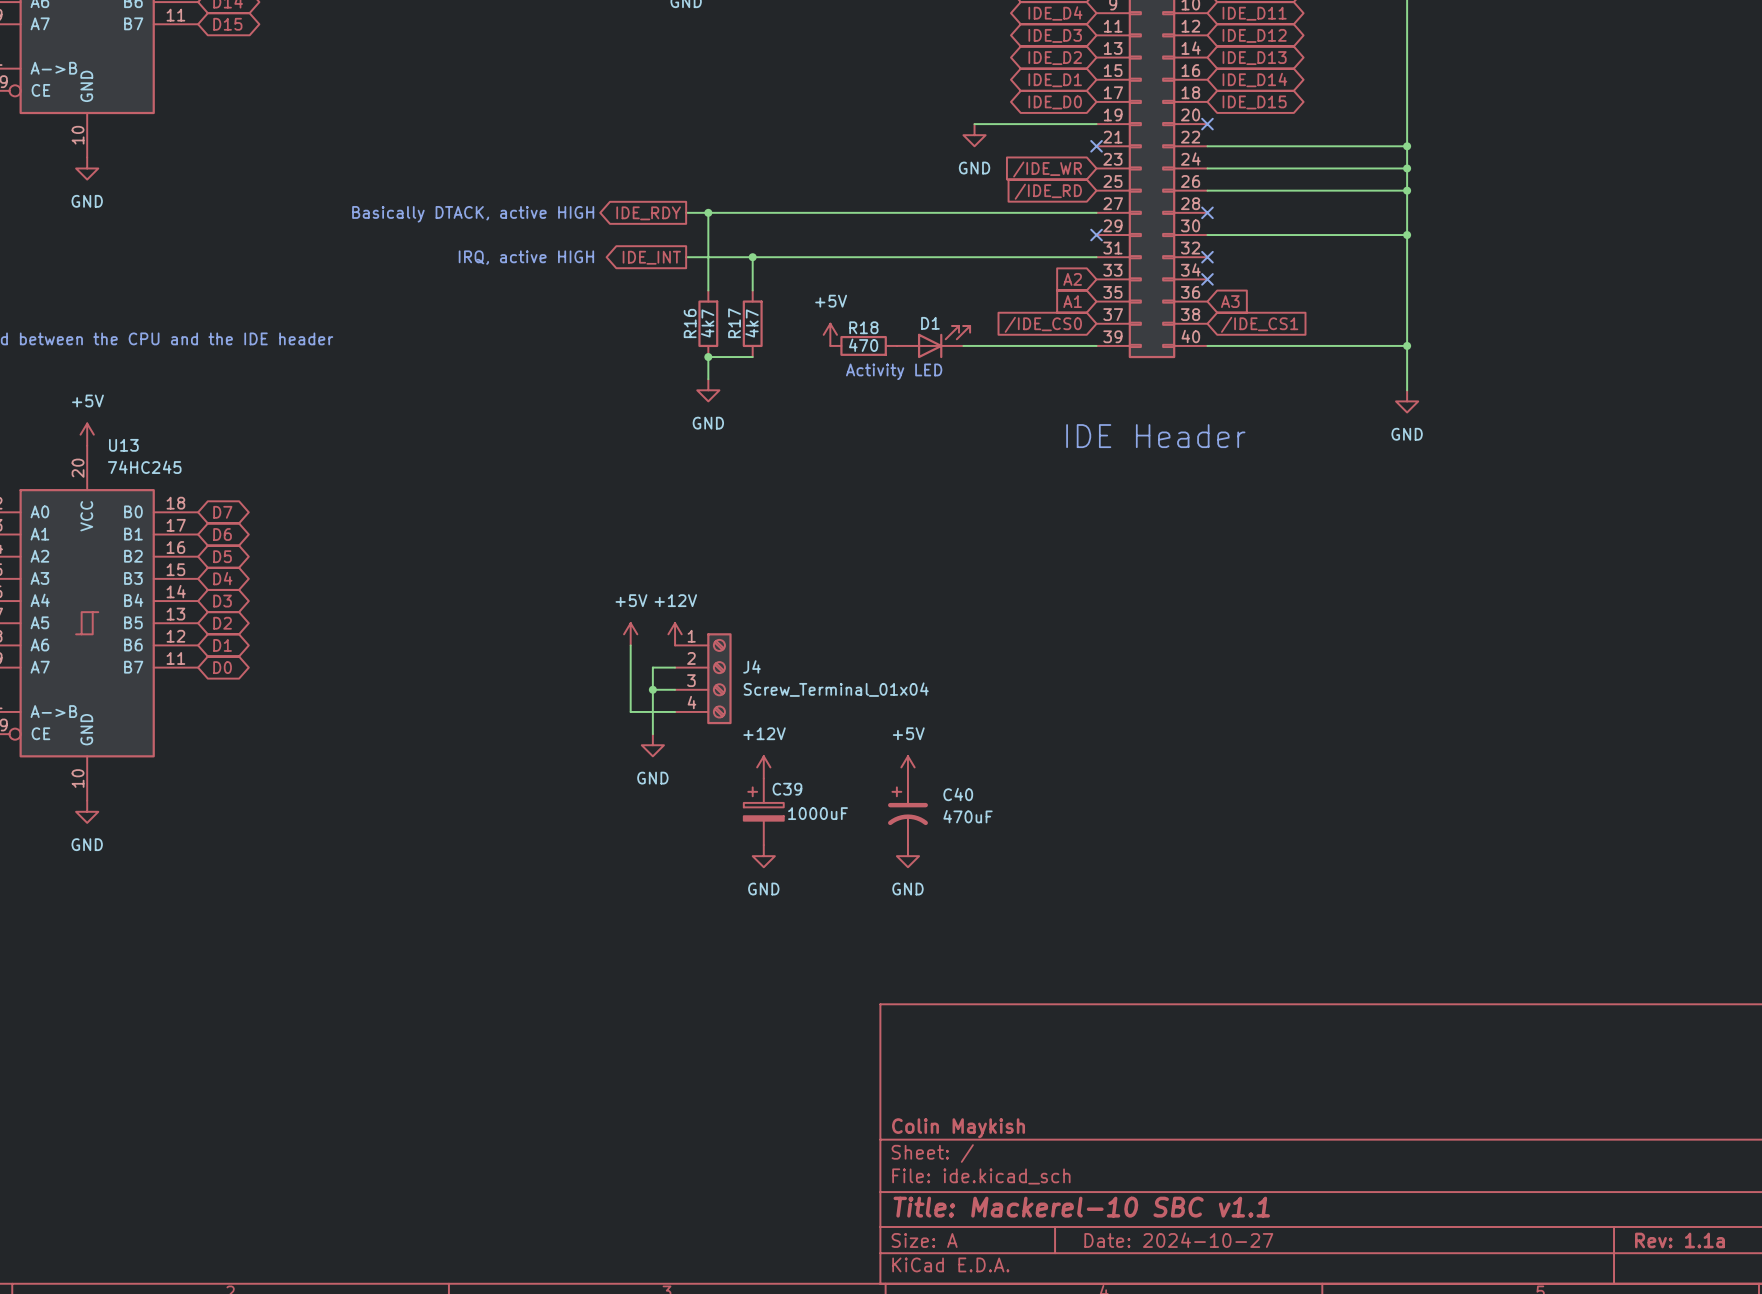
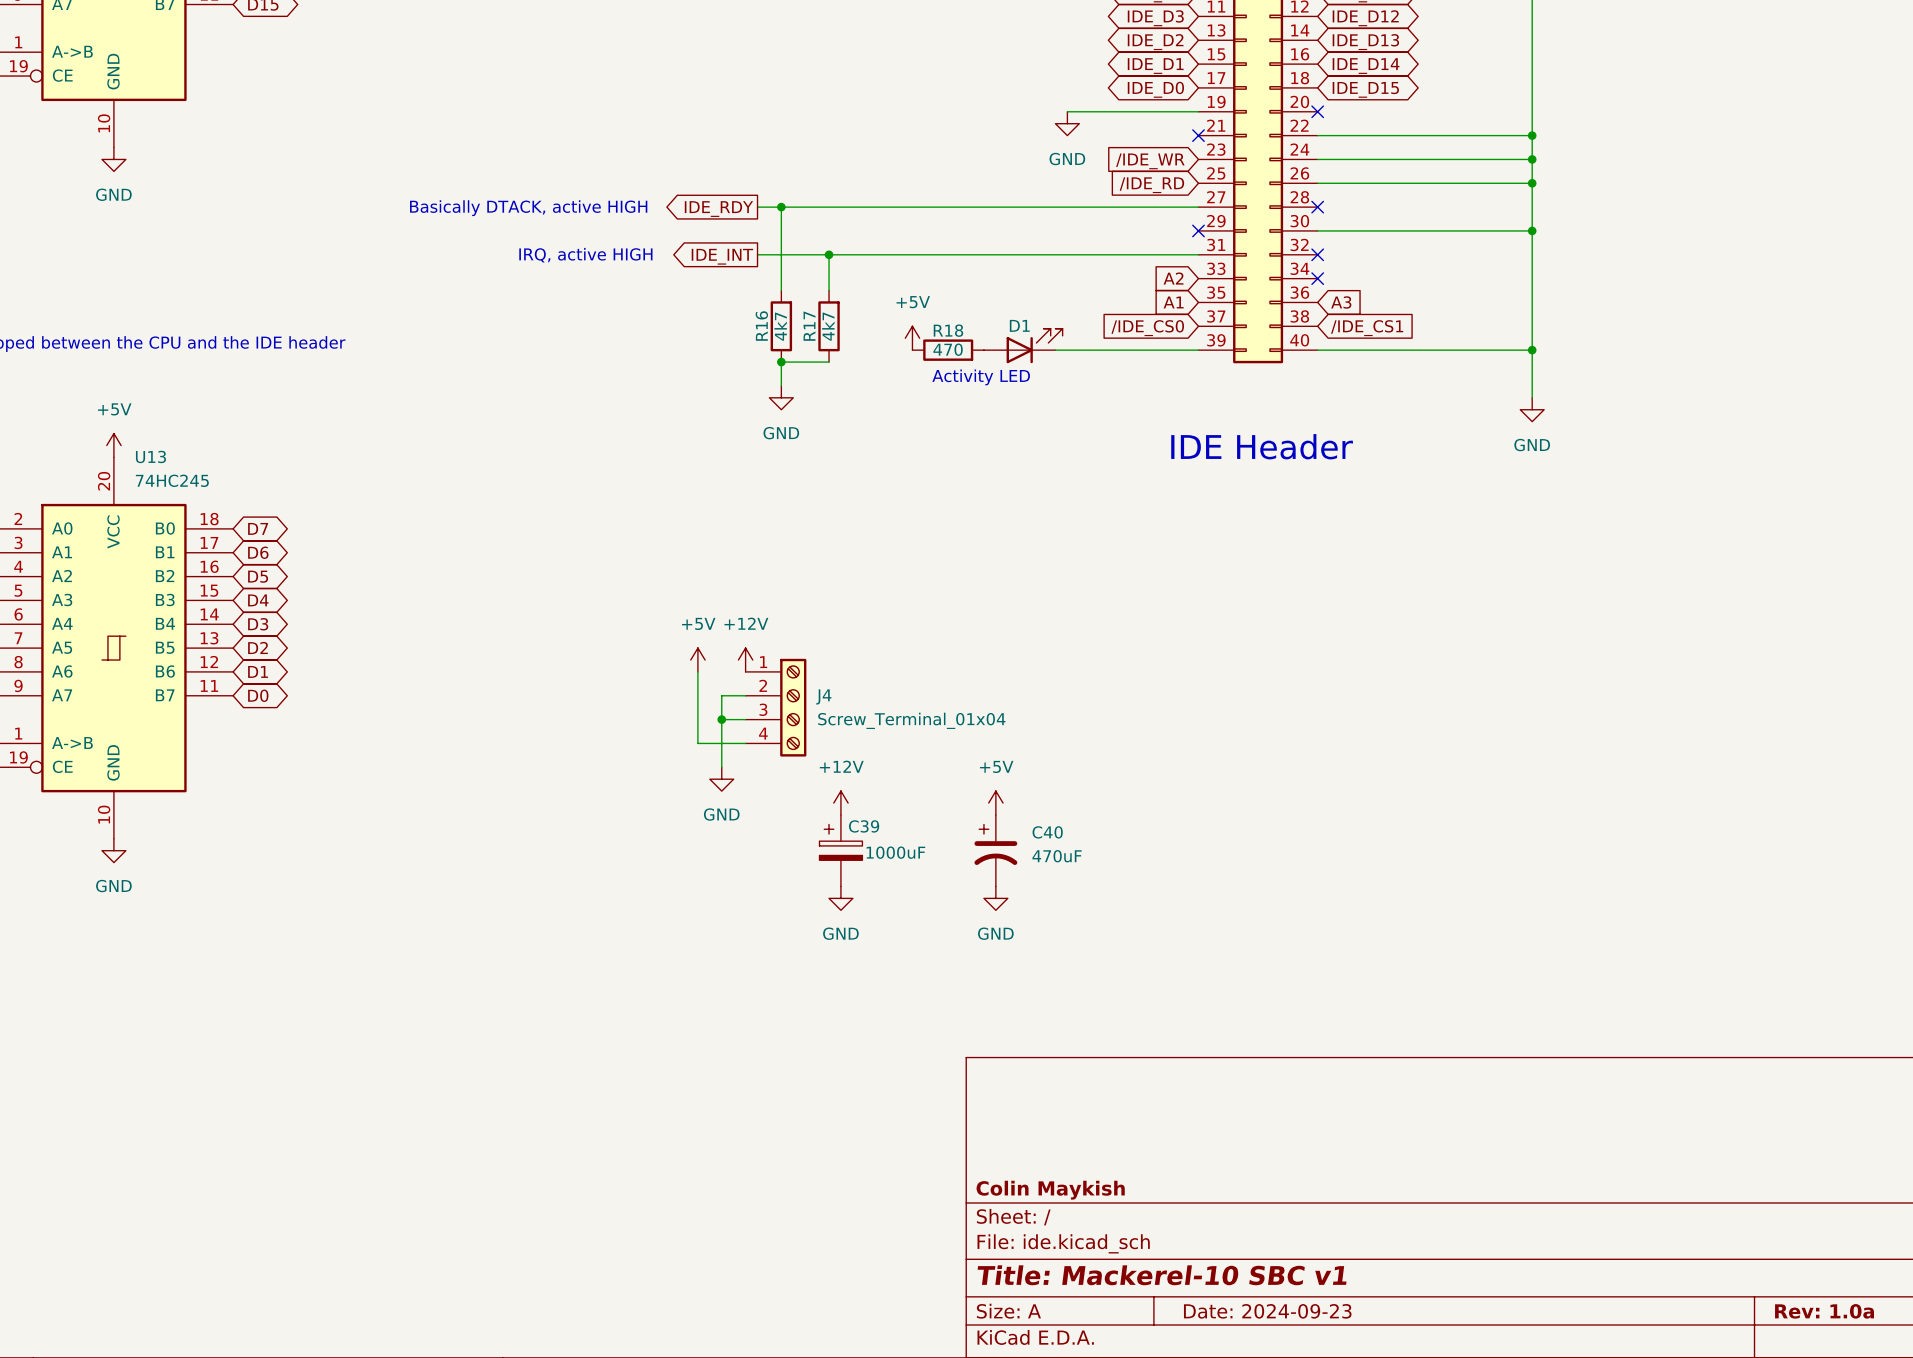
title block: Title: Mackerel-10 SBC v1.1 (1081, 1207) -> Title: Mackerel-10 SBC v1 (1162, 1275)
title block: Date: 2024-10-27 (1178, 1240) -> Date: 2024-09-23 (1267, 1311)
title block: Rev: 1.1a (1679, 1240) -> Rev: 1.0a (1824, 1311)

